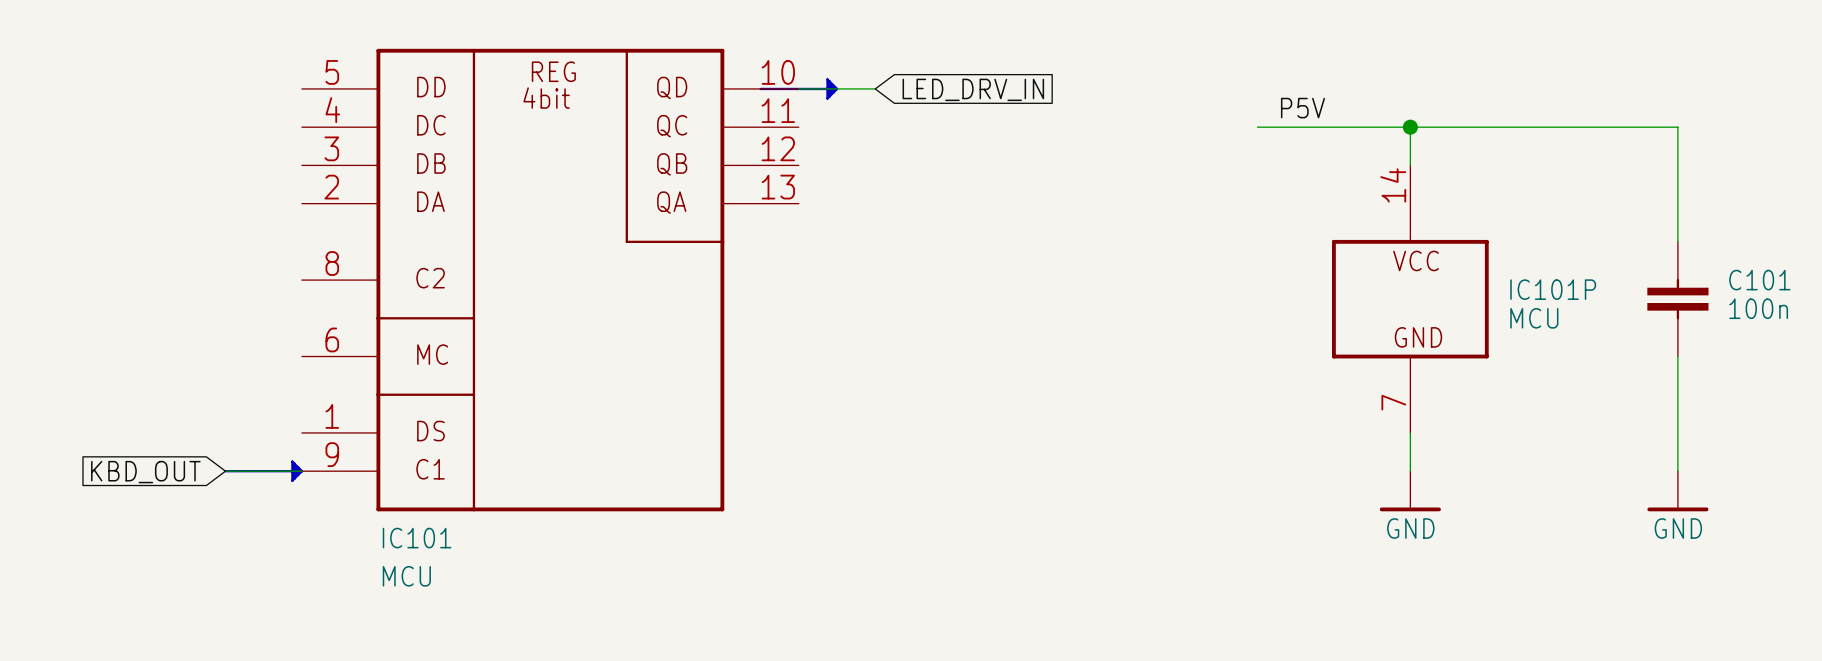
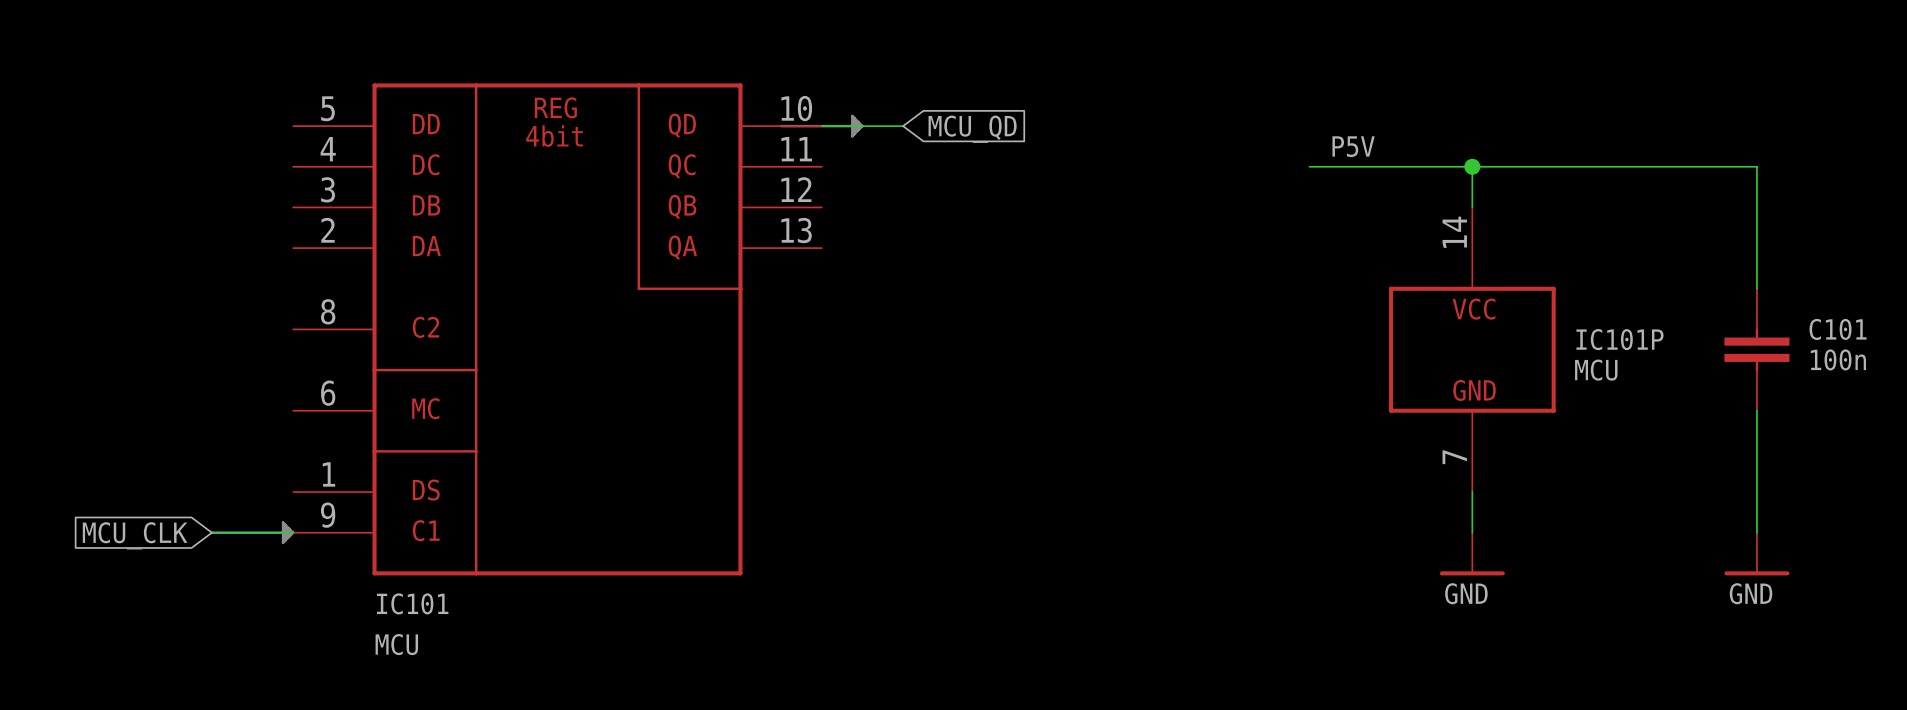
global label: LED_DRV_IN (973, 89) -> MCU_QD (972, 129)
global label: KBD_OUT (145, 472) -> MCU_CLK (135, 535)

